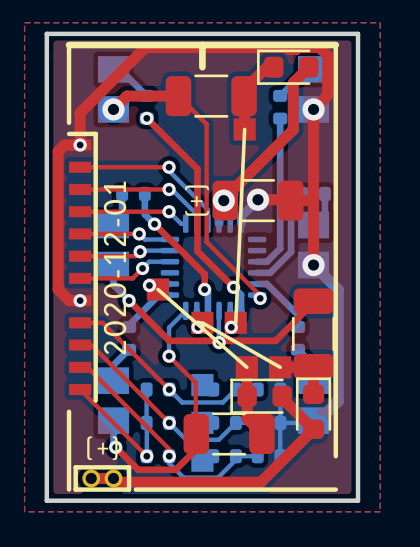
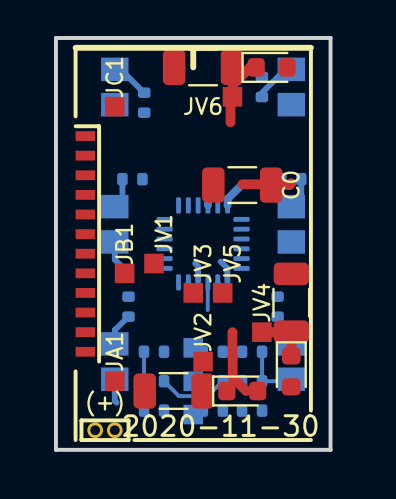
top zone outline: (24, 22) (24, 511) (380, 511) (380, 22) (24, 22) -> none
top track: (308, 67) (293, 82) (293, 129) (222, 200) -> none
part position: (211, 96) -> (203, 67)
JV6: none -> (232, 96)
part position: (280, 107) -> (261, 87)
top track: (113, 109) (126, 96) (178, 96) (206, 124) (206, 241) (260, 295) (260, 298) -> none
via: (113, 109) -> none
via: (313, 109) -> none
JC1: none -> (114, 106)
top track: (146, 118) (197, 169) (197, 251) (233, 287) -> none
via: (146, 118) -> none
bottom track: (280, 118) (280, 248) (266, 261) (257, 261) -> none
line: (244, 129) (235, 322) -> none
part: (244, 129) -> none
via: (80, 145) -> none
top track: (80, 167) (169, 167) -> none
bottom track: (169, 167) (169, 170) (207, 209) (207, 223) -> none
via: (169, 167) -> none
top track: (80, 189) (169, 189) -> none
bottom track: (169, 189) (171, 189) (196, 214) (196, 223) -> none
via: (169, 189) -> none
bottom track: (144, 193) (144, 214) (154, 224) -> none
bottom track: (302, 193) (291, 205) (291, 251) (270, 272) (257, 272) -> none
via: (257, 199) -> none
text: (+) (197, 200) -> none
via: (223, 200) -> none
C0 name: none -> C0 (290, 185)
top track: (80, 211) (169, 211) -> none
bottom track: (169, 211) (181, 223) (185, 223) -> none
via: (169, 211) -> none
top track: (154, 224) (204, 274) (204, 289) -> none
via: (154, 224) -> none
top track: (80, 233) (139, 233) -> none
bottom track: (139, 233) (144, 239) (169, 239) -> none
via: (139, 233) -> none
bottom track: (169, 250) (140, 251) -> none
top track: (140, 251) (135, 256) (80, 256) -> none
via: (140, 251) -> none
JV1 name: none -> JV1 (163, 234)
bottom track: (169, 261) (149, 261) (142, 268) -> none
bottom track: (313, 265) (338, 289) (338, 401) (318, 420) (313, 420) -> none
top track: (313, 265) (313, 109) (327, 95) (327, 55) (319, 47) (298, 47) (296, 49) (287, 47) (145, 47) (80, 112) (80, 145) (64, 145) (58, 151) (58, 289) (69, 300) (80, 300) -> none
via: (313, 265) -> none
text: 2020-12-01 (115, 267) -> none
top track: (142, 268) (132, 278) (80, 278) -> none
via: (142, 268) -> none
bottom track: (257, 283) (266, 283) (297, 315) (297, 327) -> none
via: (149, 285) -> none
via: (233, 287) -> none
line: (157, 289) (246, 367) -> none
via: (204, 289) -> none
JV3 name: none -> JV3 (202, 263)
JV5 name: none -> JV5 (231, 263)
bottom track: (169, 295) (159, 295) (129, 325) -> none
via: (260, 298) -> none
via: (80, 300) -> none
JB1: none -> (124, 273)
top track: (129, 300) (169, 340) (275, 340) (313, 302) -> none
via: (129, 300) -> none
bottom track: (185, 310) (169, 327) (169, 356) -> none
top track: (80, 322) (102, 322) (169, 389) -> none
line: (202, 322) (280, 367) -> none
via: (197, 327) -> none
via: (231, 327) -> none
JV4 name: none -> JV4 (260, 302)
via: (219, 342) -> none
top track: (80, 345) (91, 345) (169, 422) -> none
top track: (169, 356) (195, 382) (195, 434) -> none
via: (169, 356) -> none
top track: (80, 367) (87, 367) (169, 449) (169, 456) -> none
part: (246, 367) -> none
top track: (80, 389) (146, 456) -> none
bottom track: (169, 389) (182, 402) (222, 402) (235, 389) (257, 389) -> none
via: (169, 389) -> none
part position: (261, 396) -> (239, 390)
top track: (282, 398) (313, 429) (260, 482) (117, 482) (113, 478) (91, 478) -> none
JV2: none -> (203, 361)
JA1: none -> (114, 381)
bottom track: (146, 422) (146, 456) -> none
via: (169, 422) -> none
bottom track: (280, 422) (280, 456) -> none
part position: (229, 434) -> (173, 390)
top track: (115, 447) (138, 469) (175, 469) (195, 449) -> none
via: (115, 447) -> none
via: (146, 456) -> none
bottom track: (169, 456) (169, 463) (183, 477) (218, 477) (235, 459) (235, 456) (257, 456) -> none
via: (169, 456) -> none
text: none -> 2020-11-30 (220, 425)

